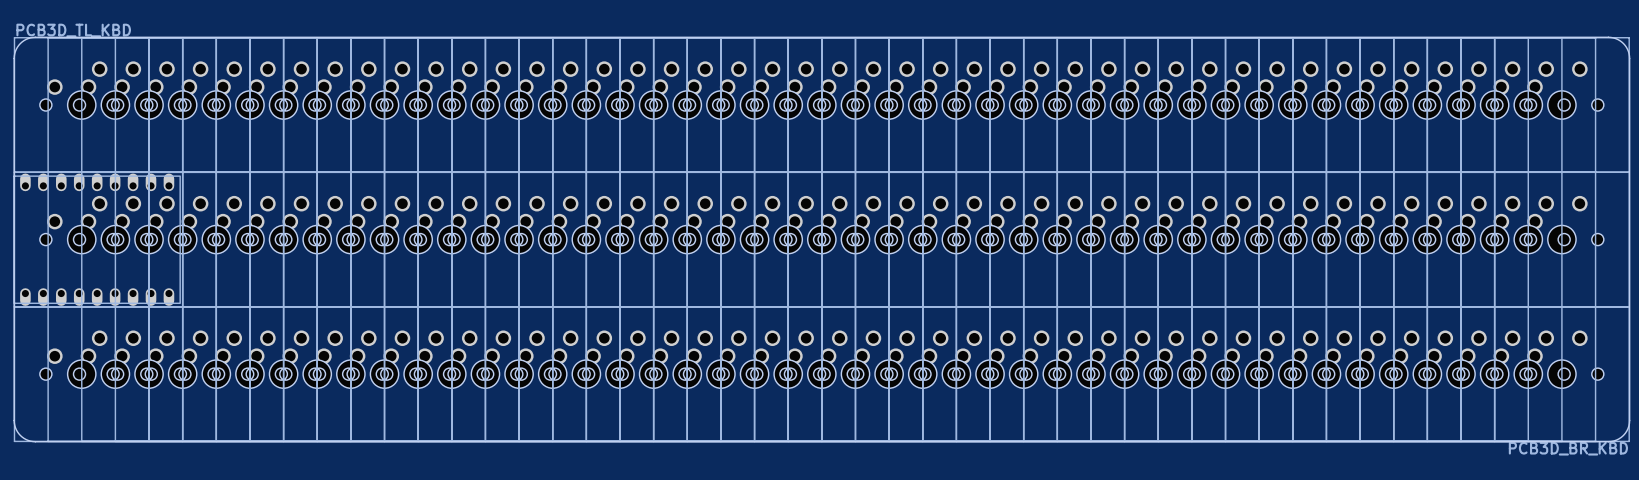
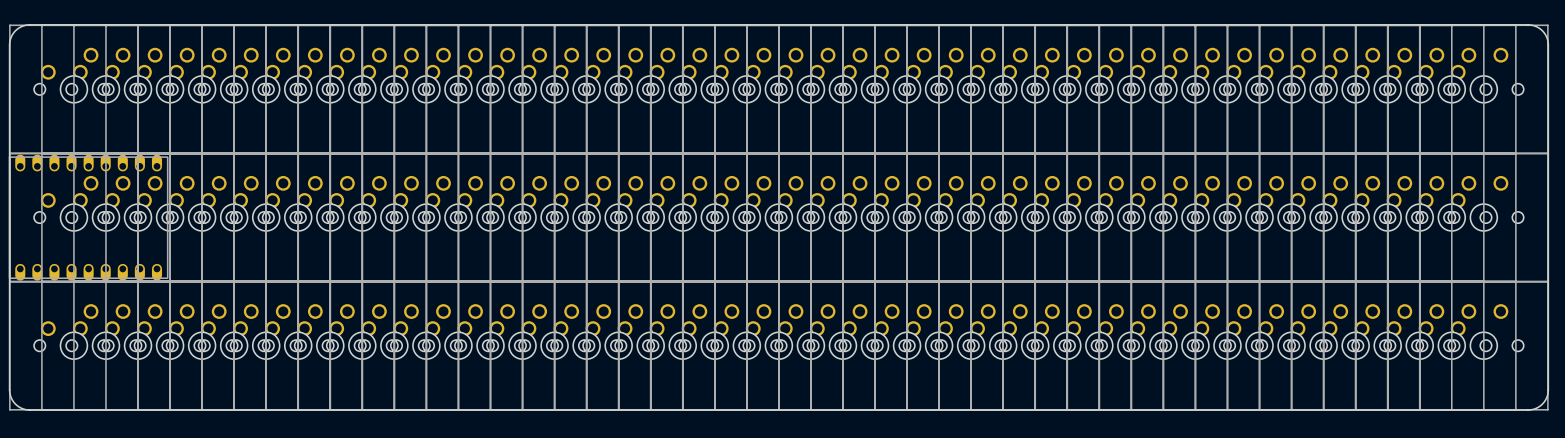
text: PCB3D_TL_KBD (73, 30) -> none
text: PCB3D_BR_KBD (1568, 448) -> none

